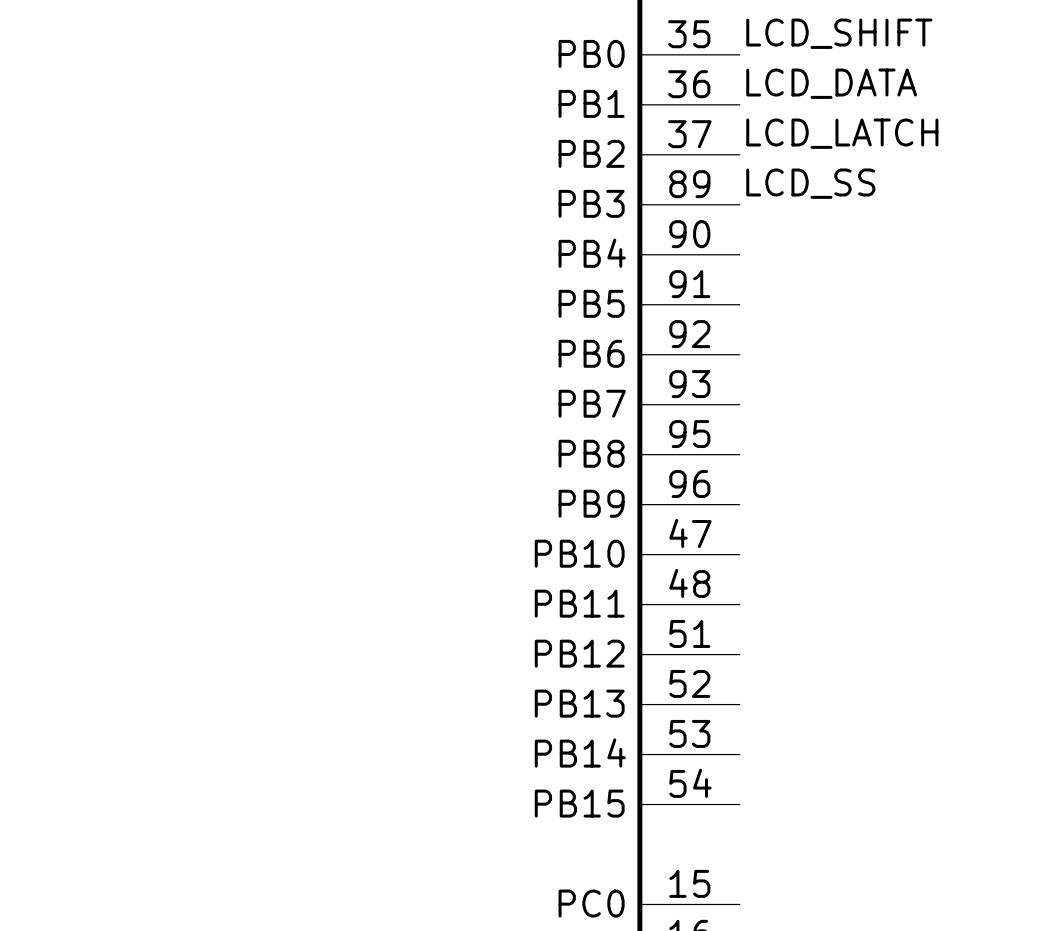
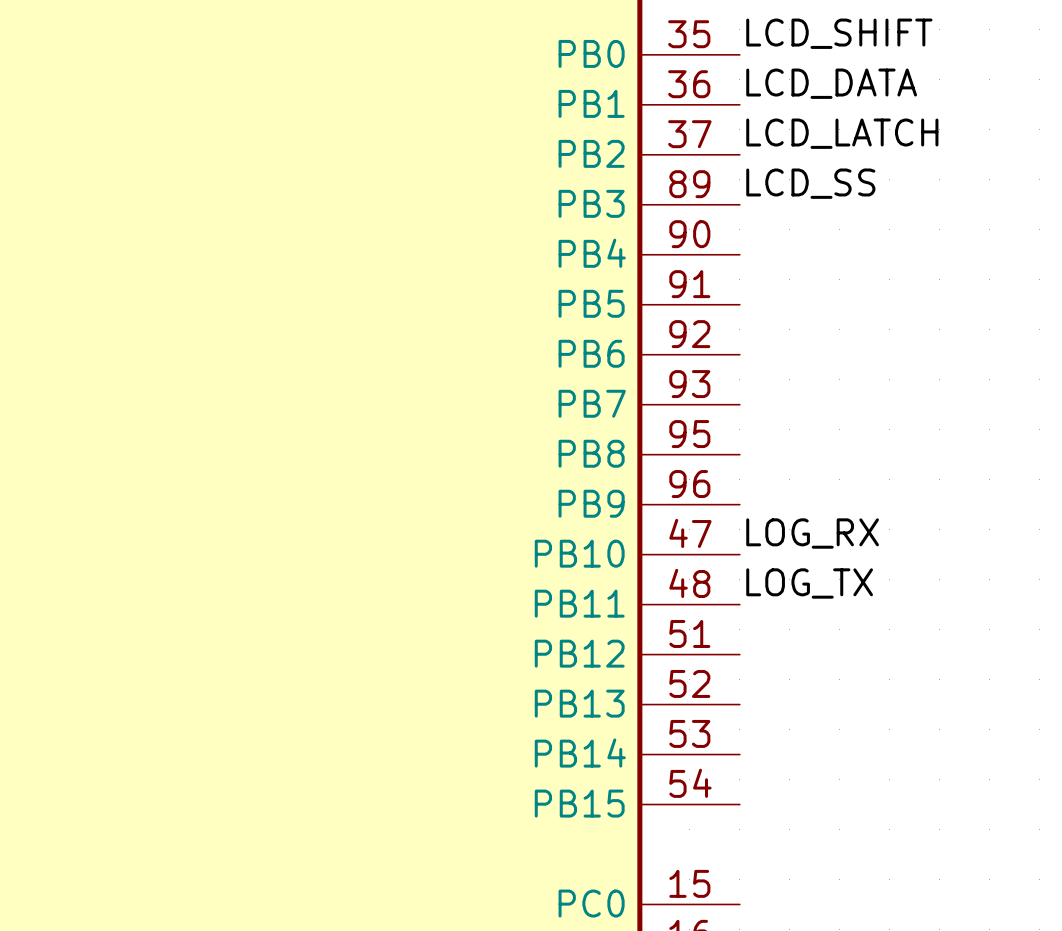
label: none -> LOG_RX (812, 533)
label: none -> LOG_TX (809, 583)

